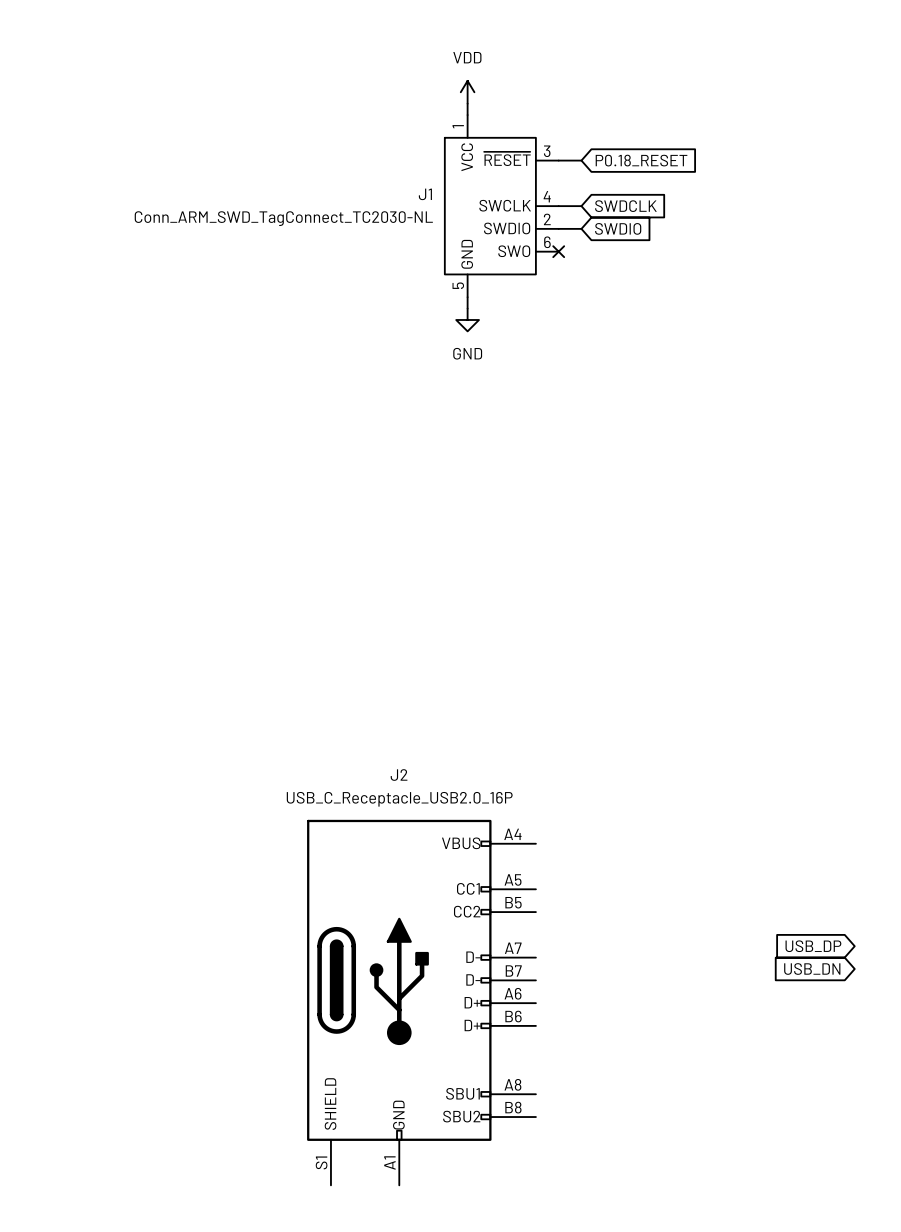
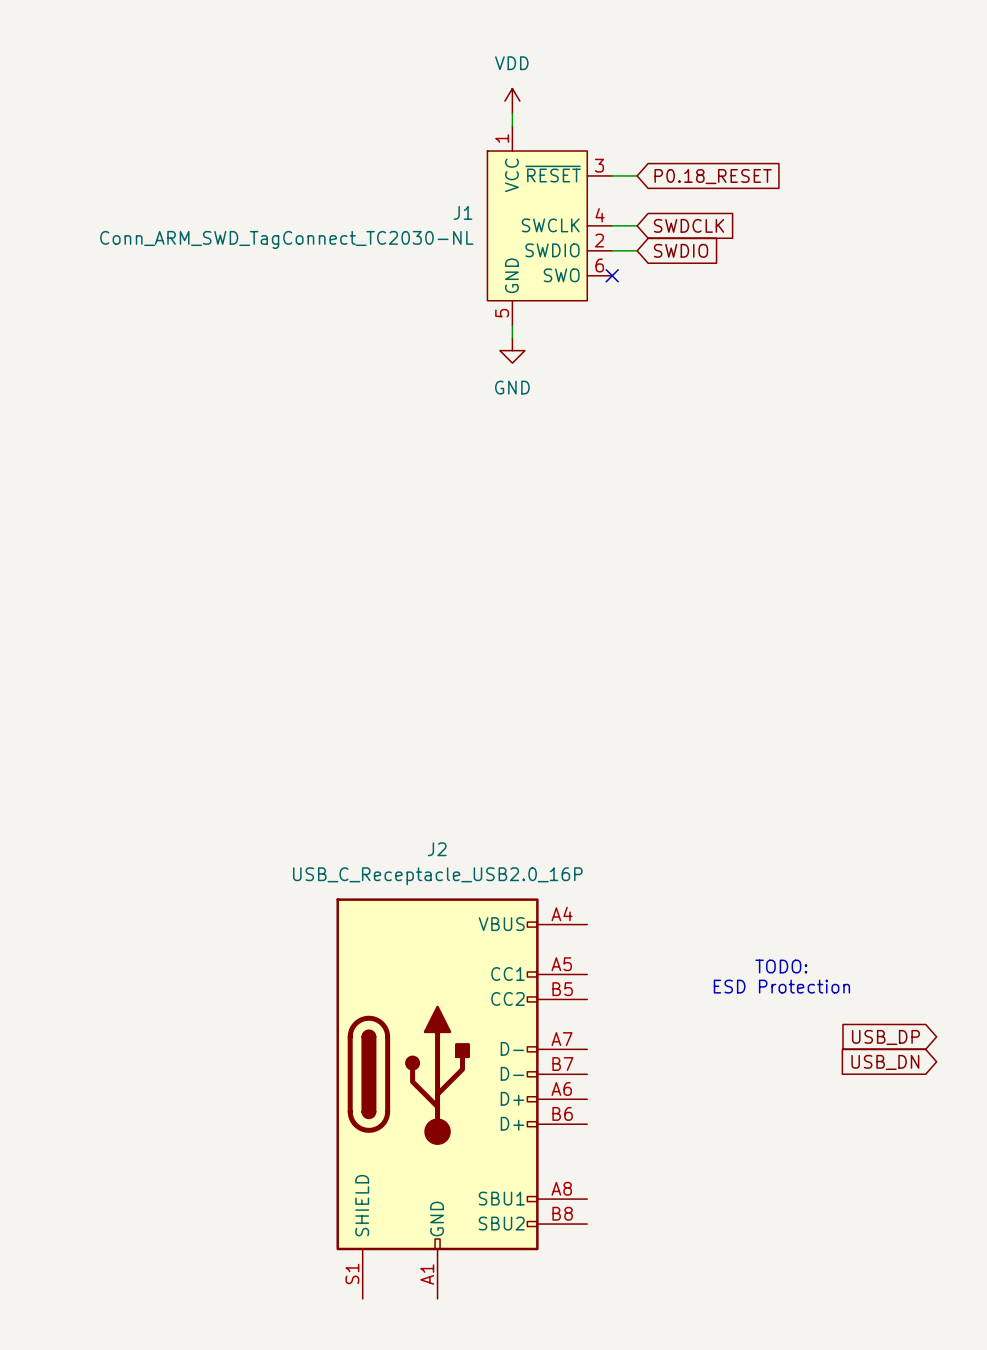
text: none -> TODO: (781, 966)
text: none -> ESD Protection (781, 986)

